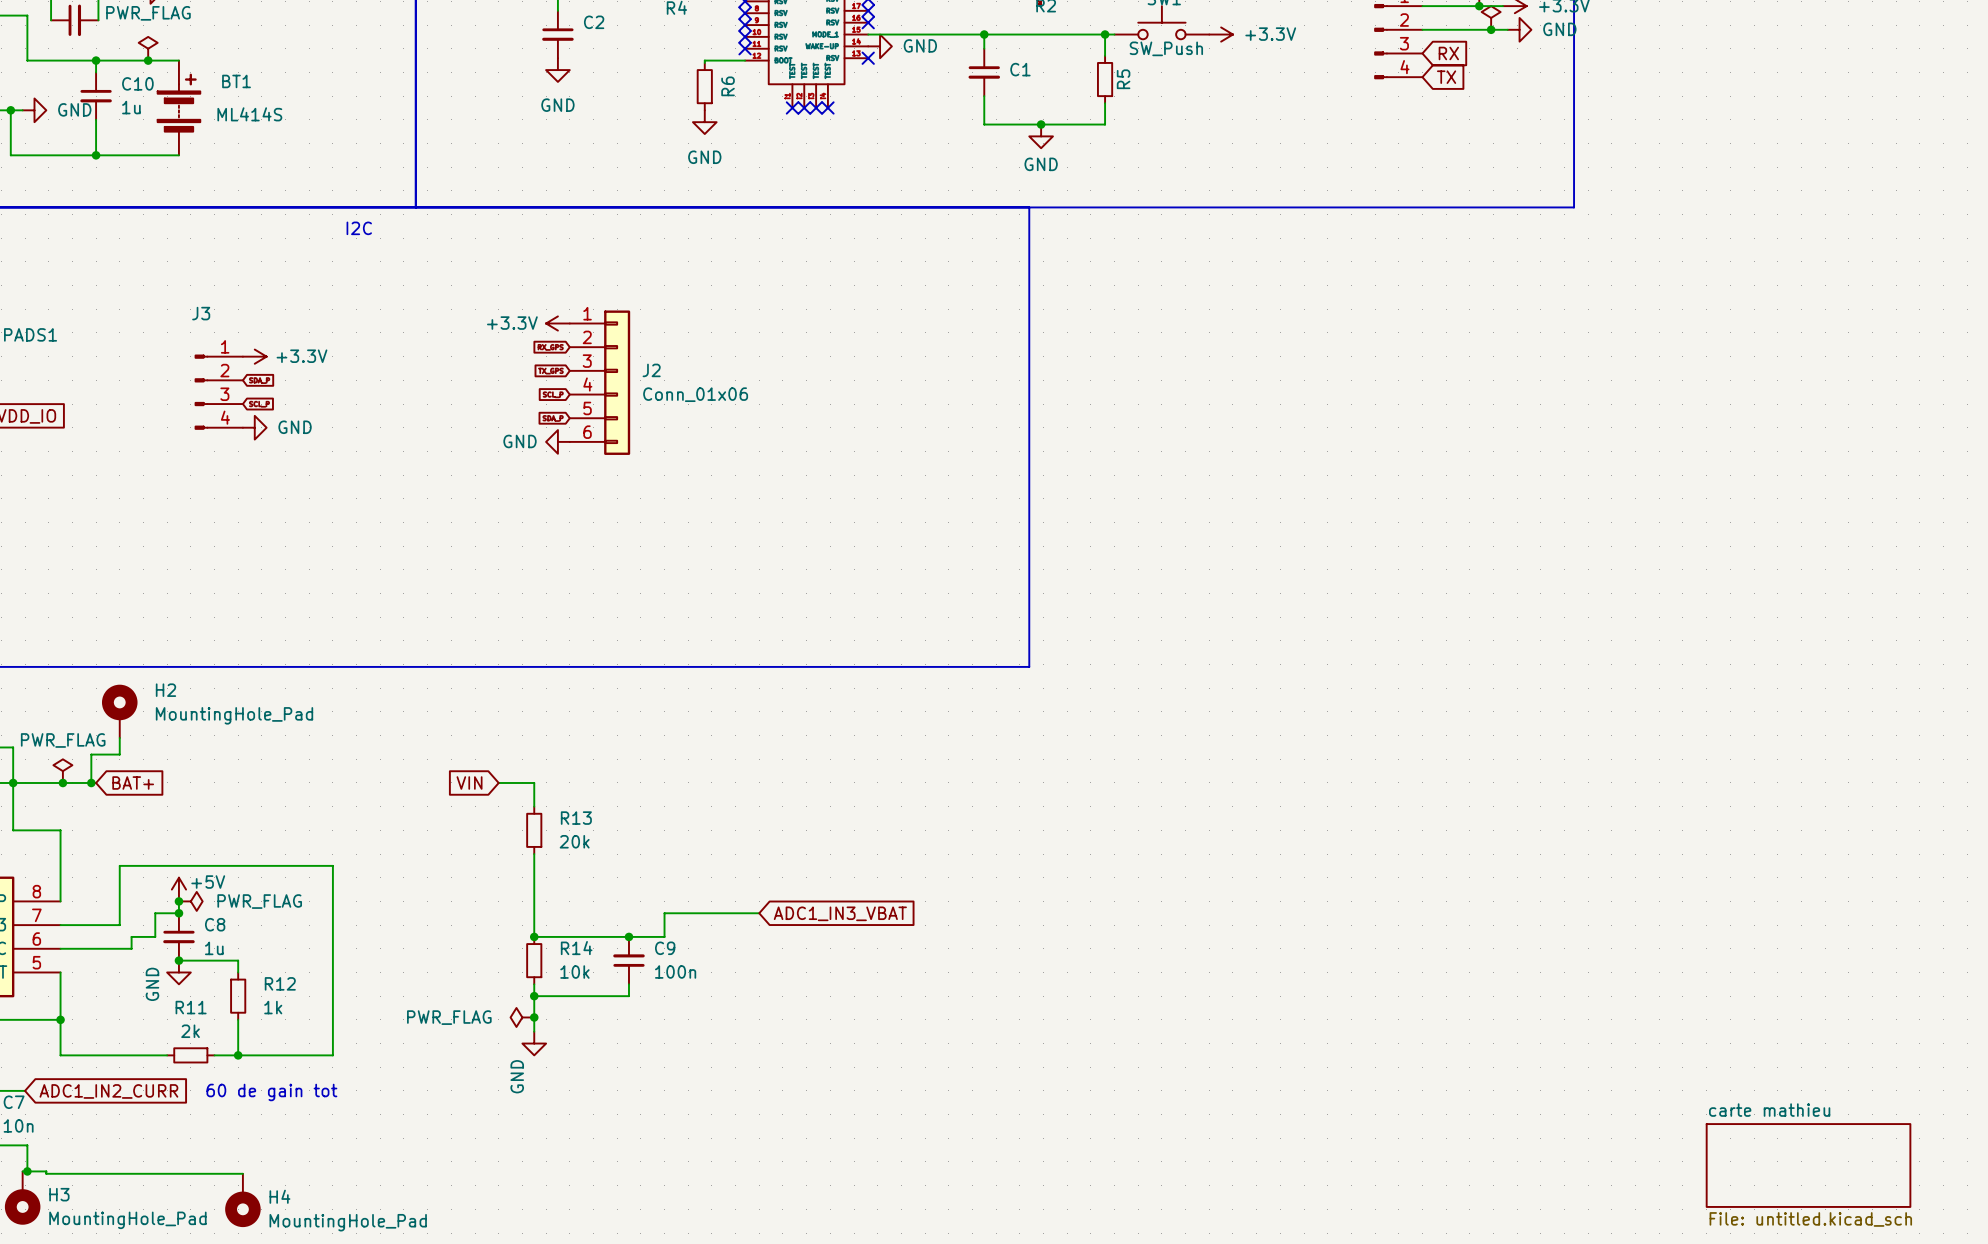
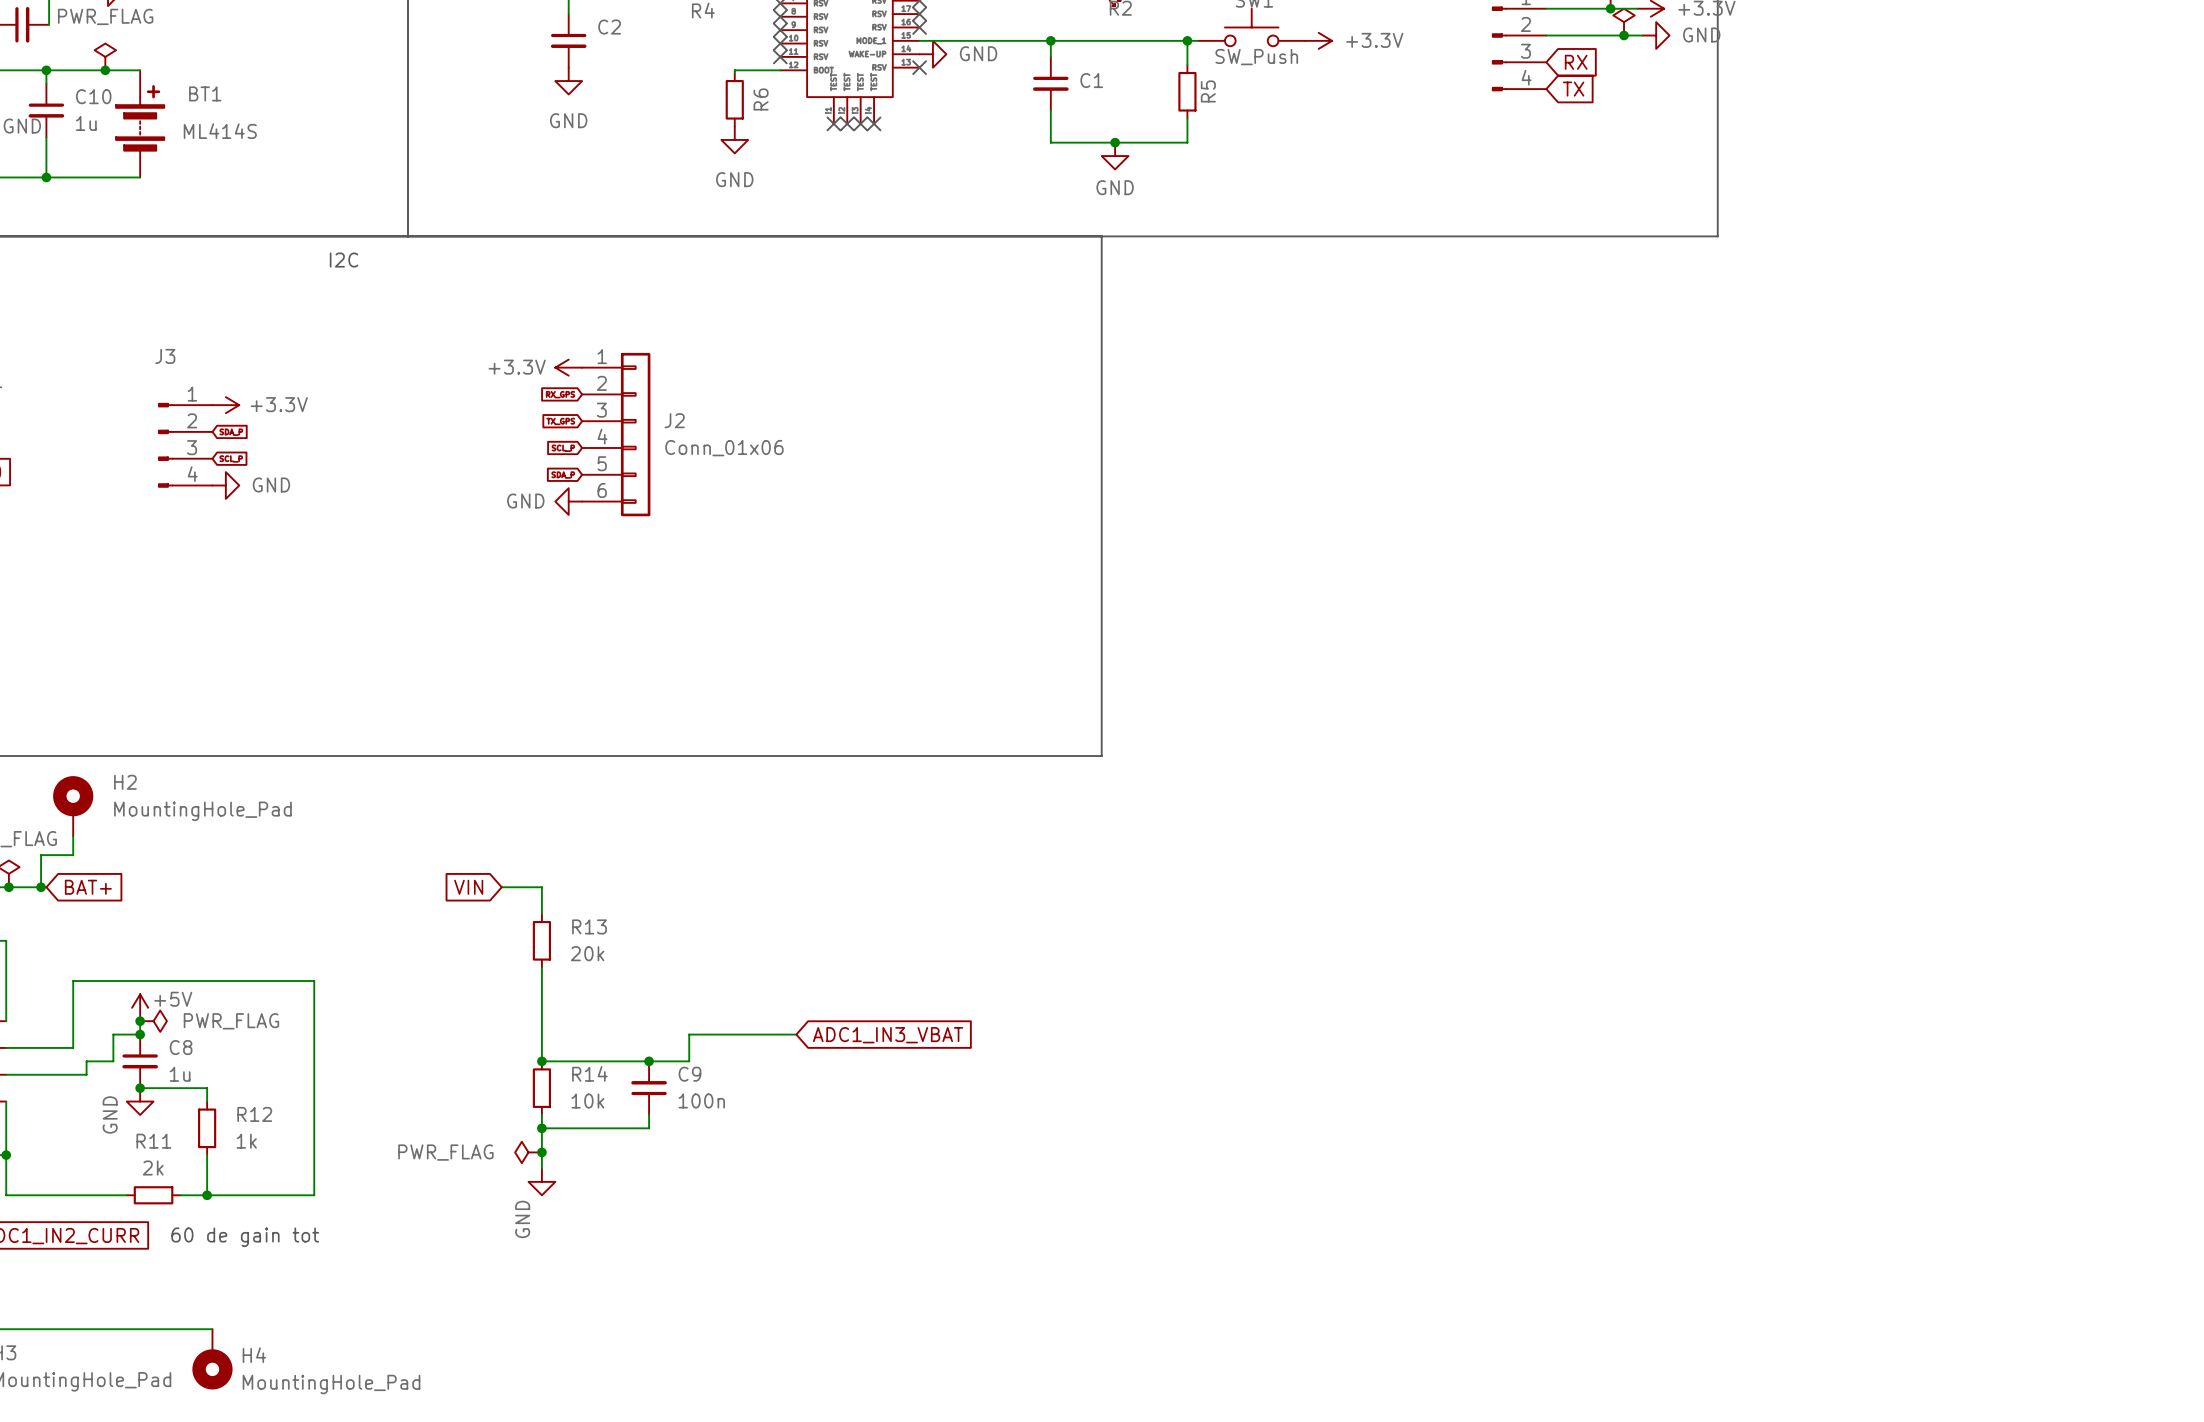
sheet carte mathieu: File: untitled.kicad_sch (1808, 1165) -> none

